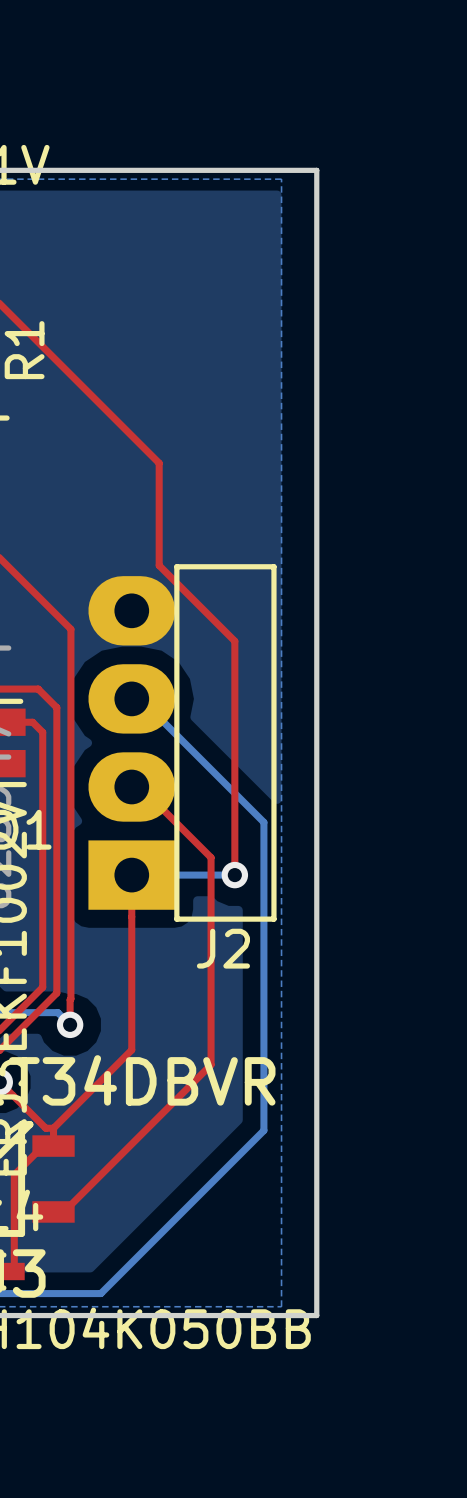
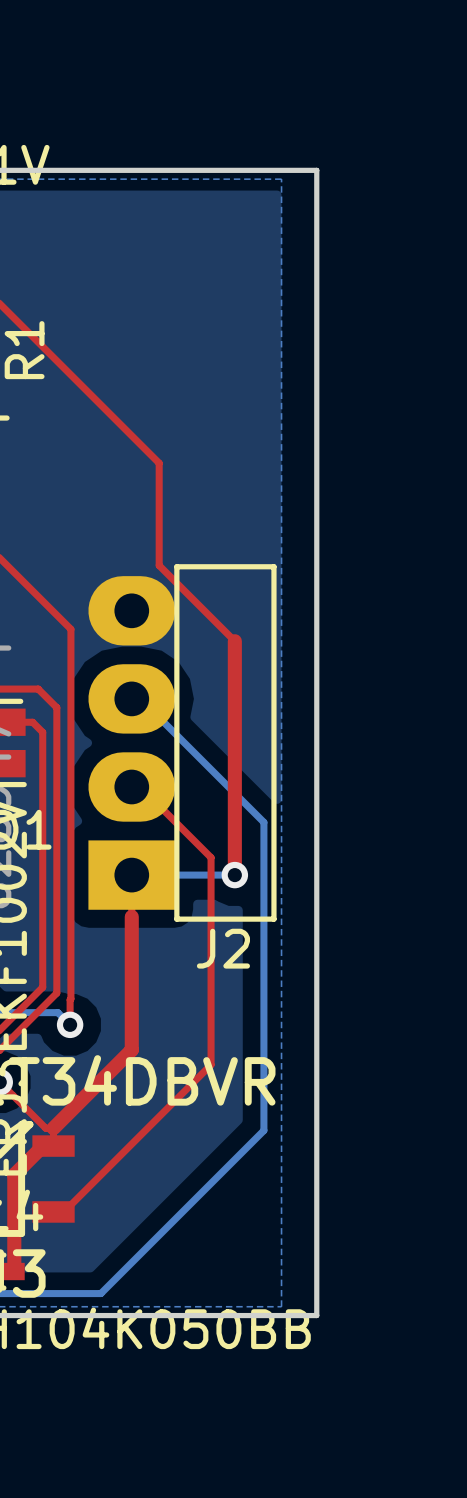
top track width: thin (234, 641) (234, 875) -> thick (234, 641) (234, 875)
top track width: thin (131, 916) (131, 1050) (53, 1128) -> thick (131, 916) (131, 1050) (53, 1128)
top track width: thin (43, 1146) (14, 1174) (14, 1271) -> thick (43, 1146) (14, 1174) (14, 1271)

